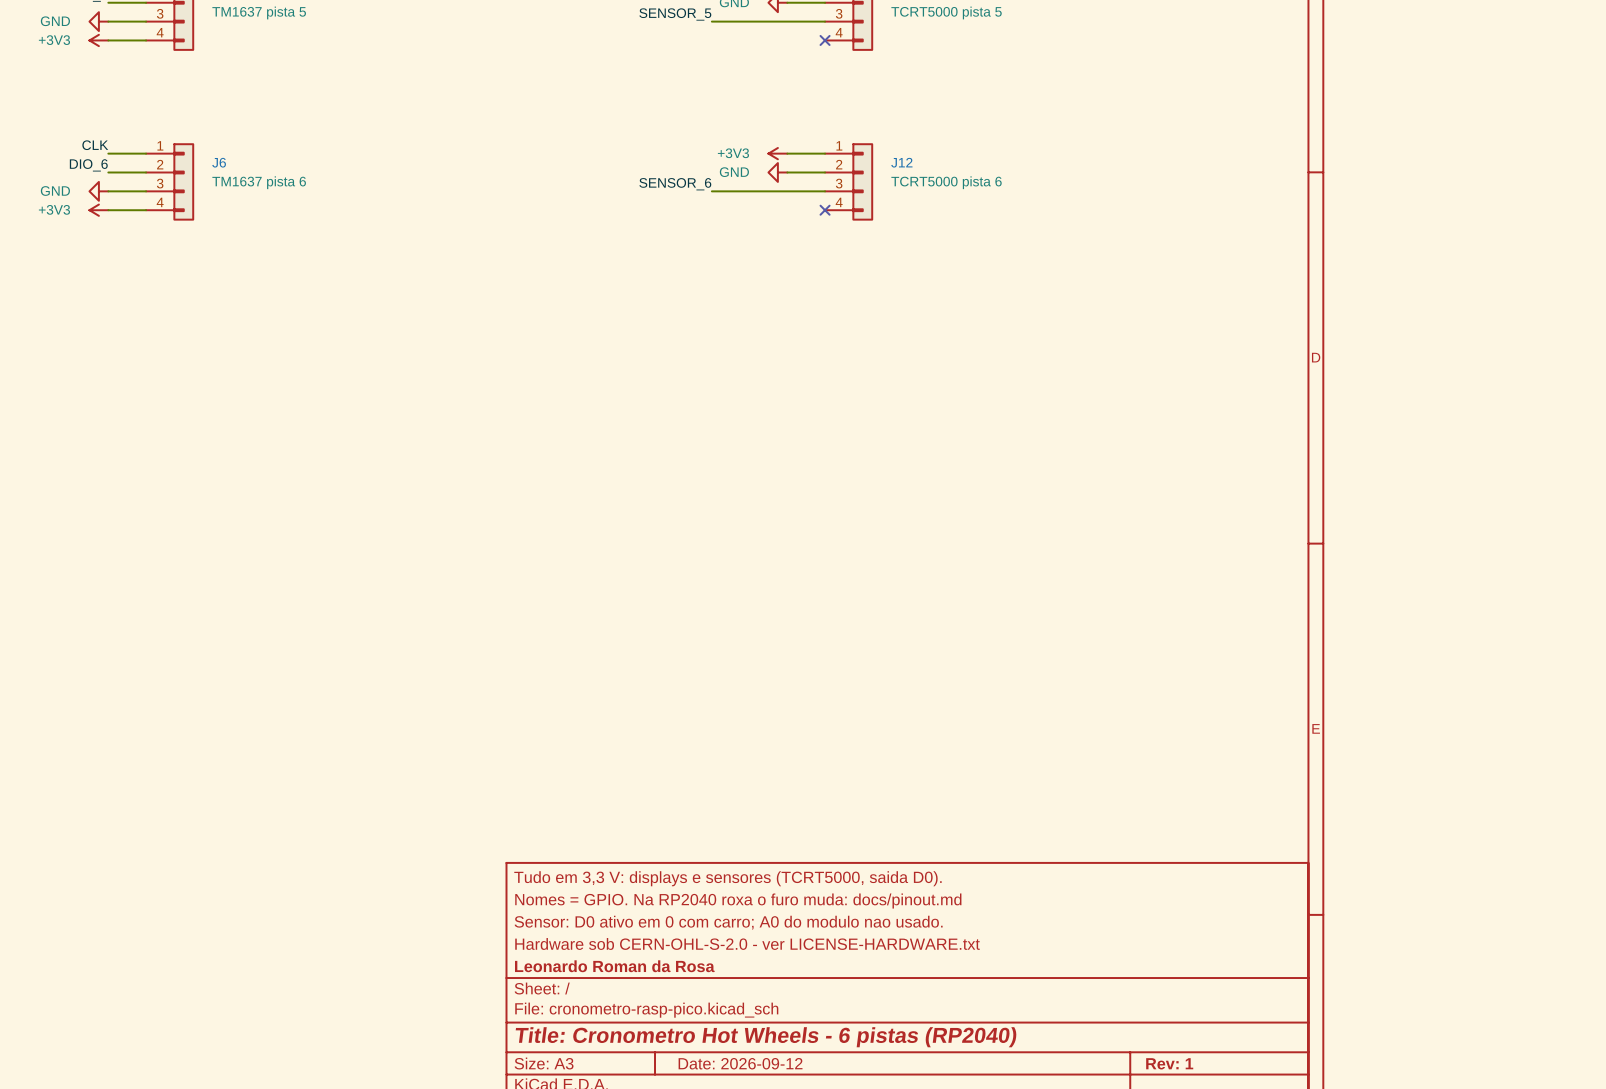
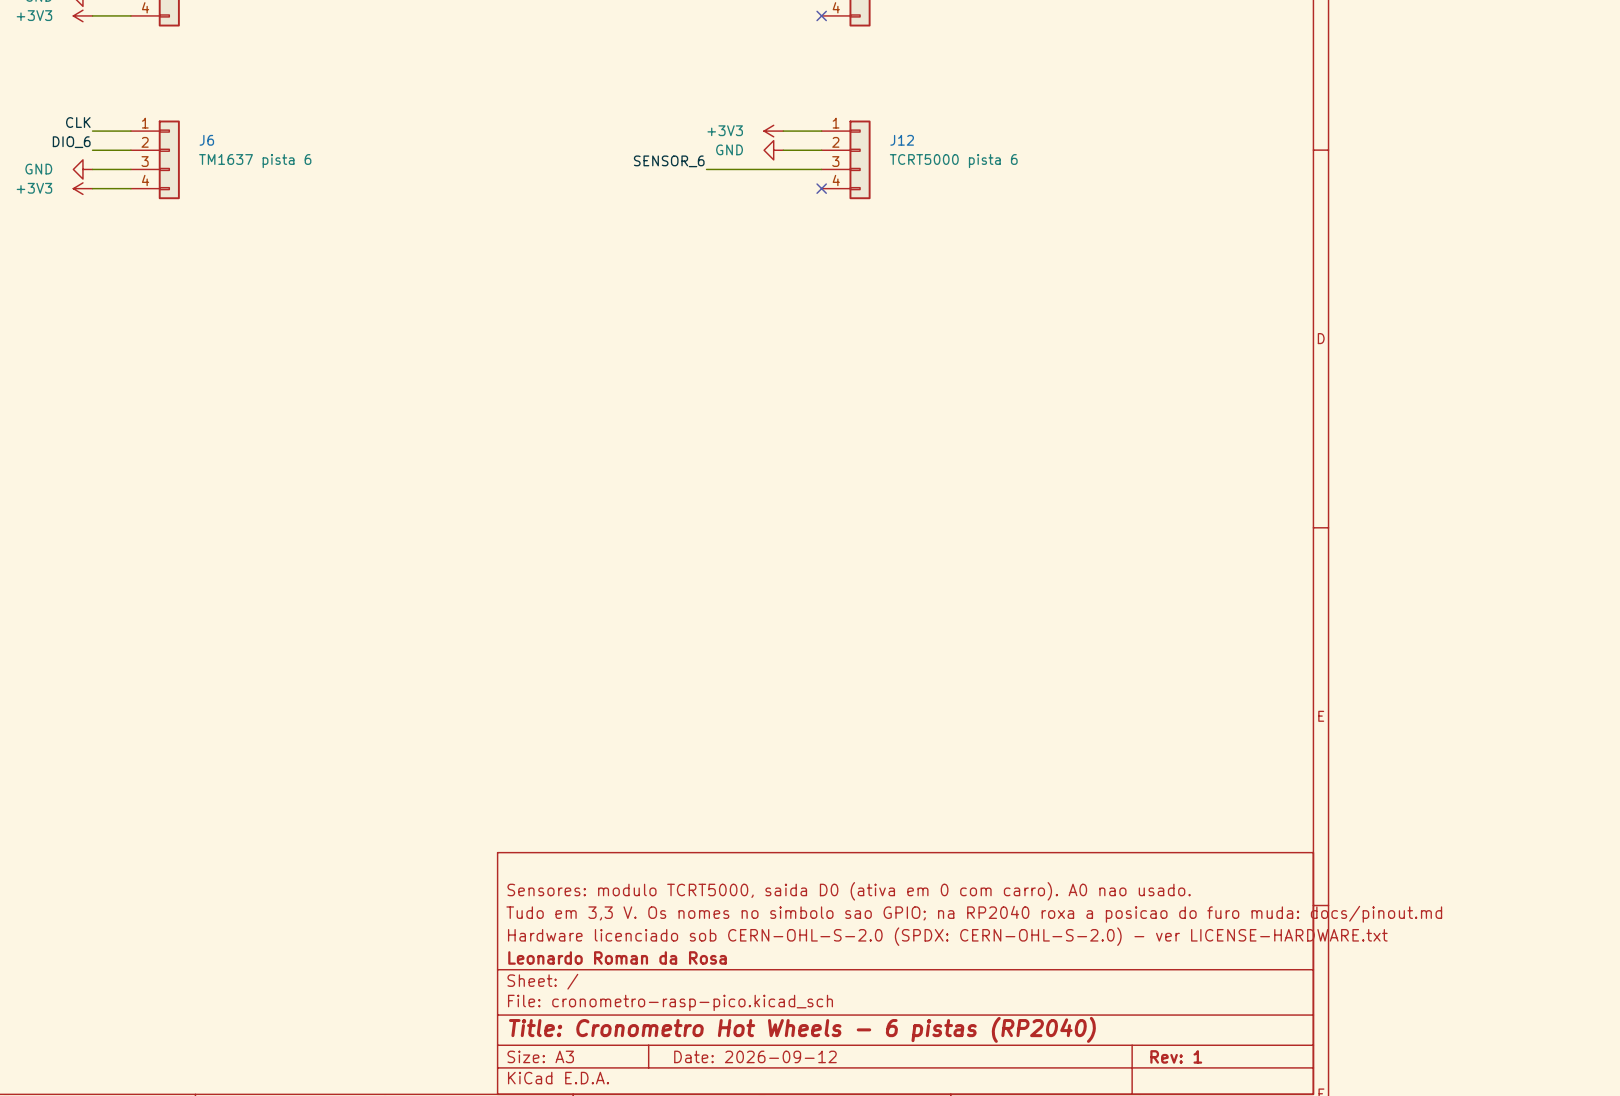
title block: Tudo em 3,3 V: displays e sensores (TCRT5000, saida D0). (727, 878) -> none
title block: Nomes = GPIO. Na RP2040 roxa o furo muda: docs/pinout.md (738, 901) -> Sensores: modulo TCRT5000, saida D0 (ativa em 0 com carro). A0 nao usado. (849, 891)
title block: Sensor: D0 ativo em 0 com carro; A0 do modulo nao usado. (728, 922) -> Tudo em 3,3 V. Os nomes no simbolo sao GPIO; na RP2040 roxa a posicao do furo muda: docs/pinout.md (974, 914)
title block: Hardware sob CERN-OHL-S-2.0 - ver LICENSE-HARDWARE.txt (747, 943) -> Hardware licenciado sob CERN-OHL-S-2.0 (SPDX: CERN-OHL-S-2.0) - ver LICENSE-HARDWARE.txt (947, 936)

